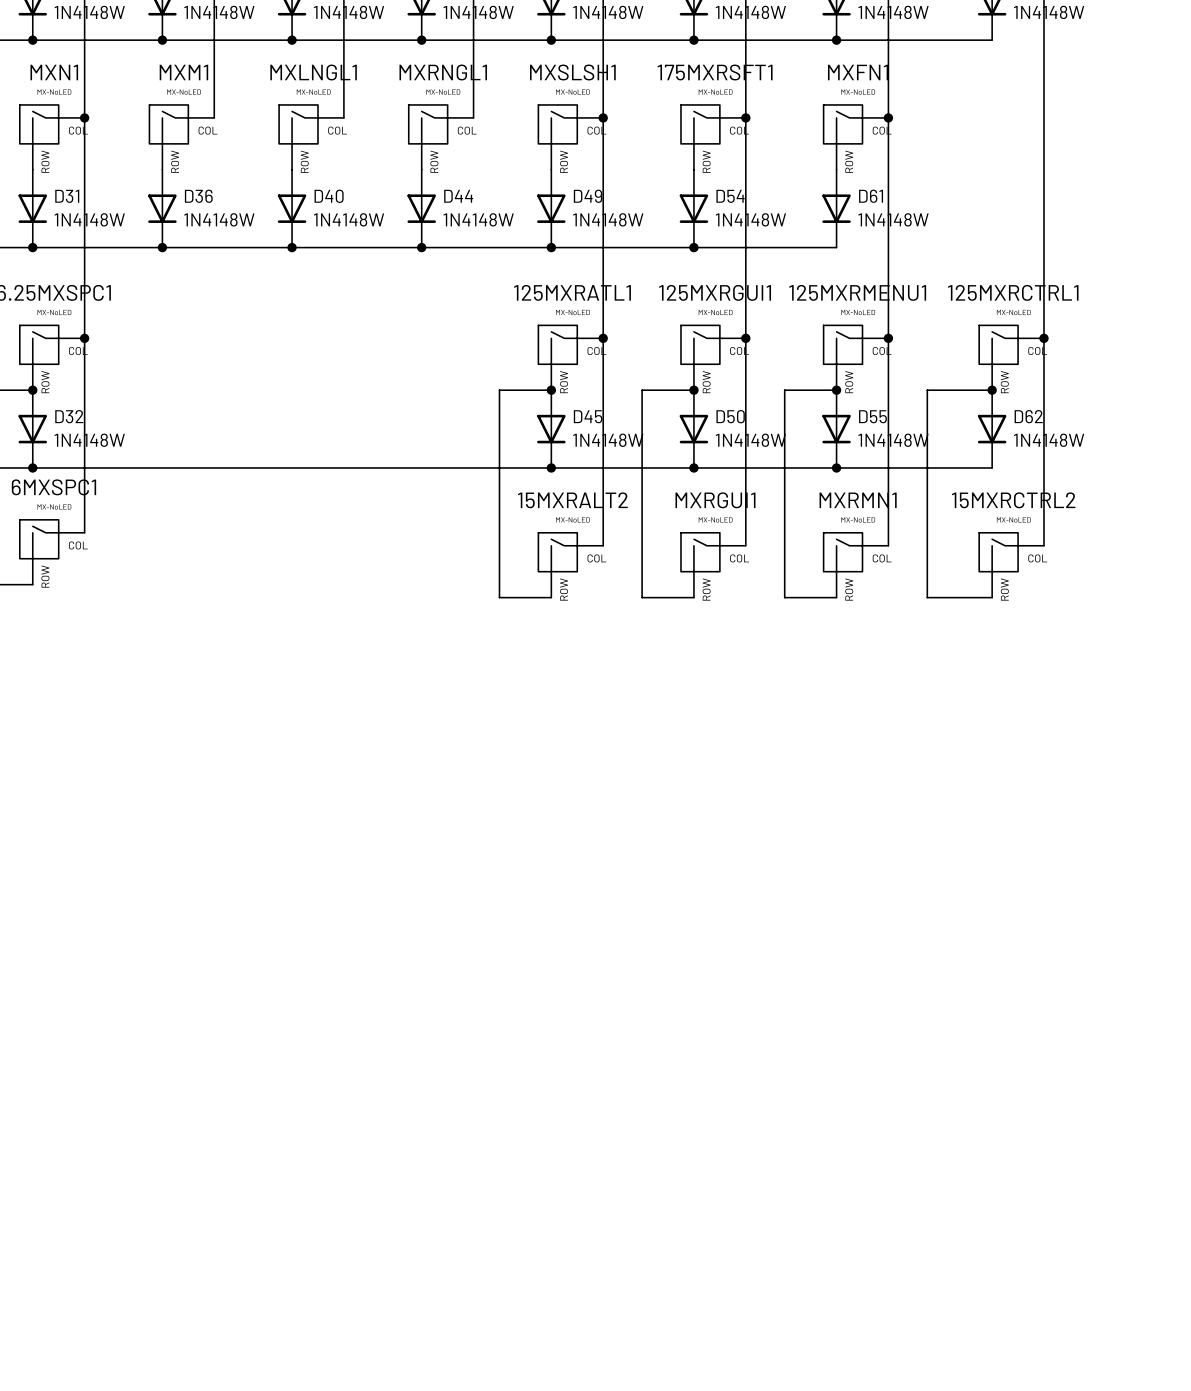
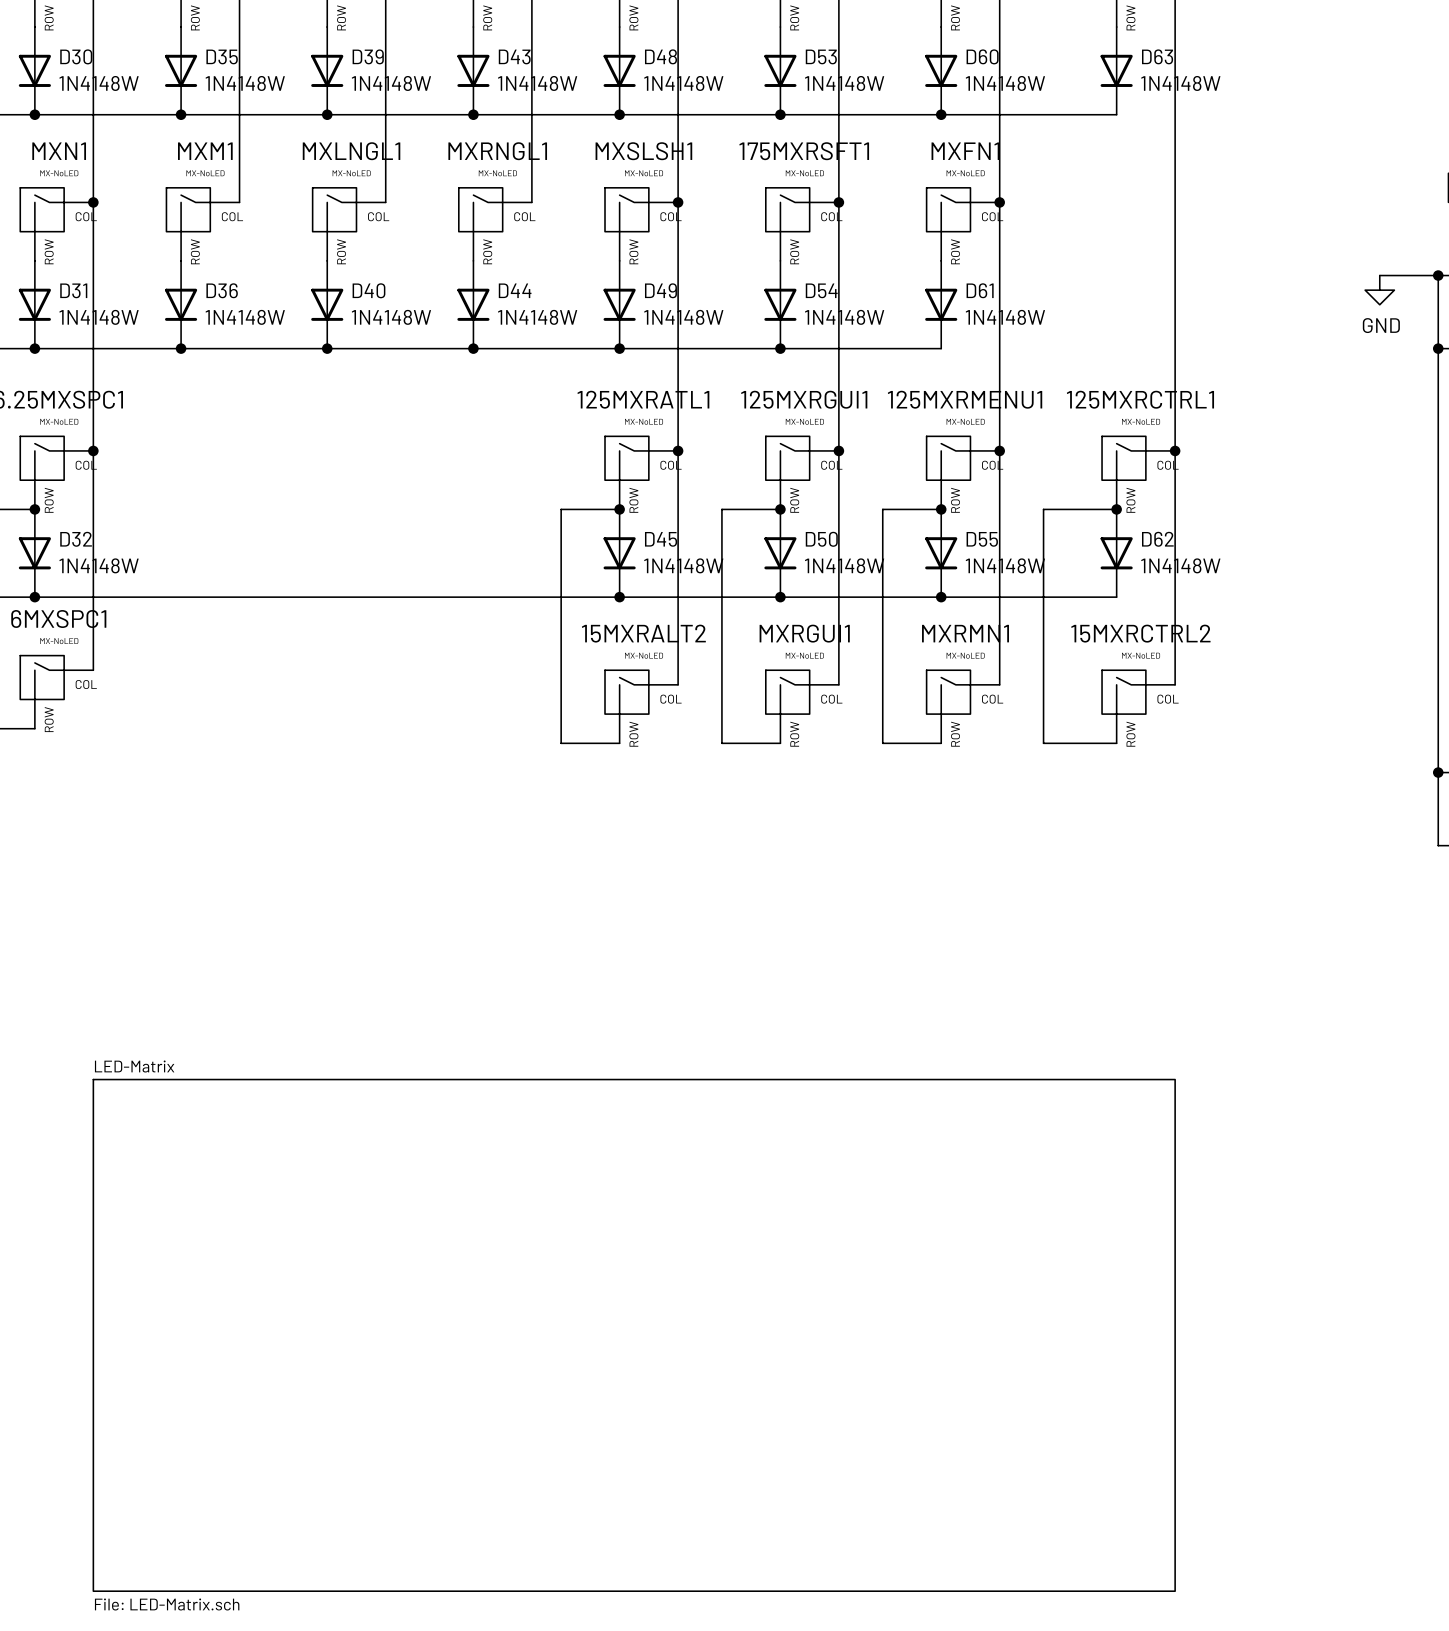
sheet LED-Matrix: none -> File: LED-Matrix.sch (634, 1335)

